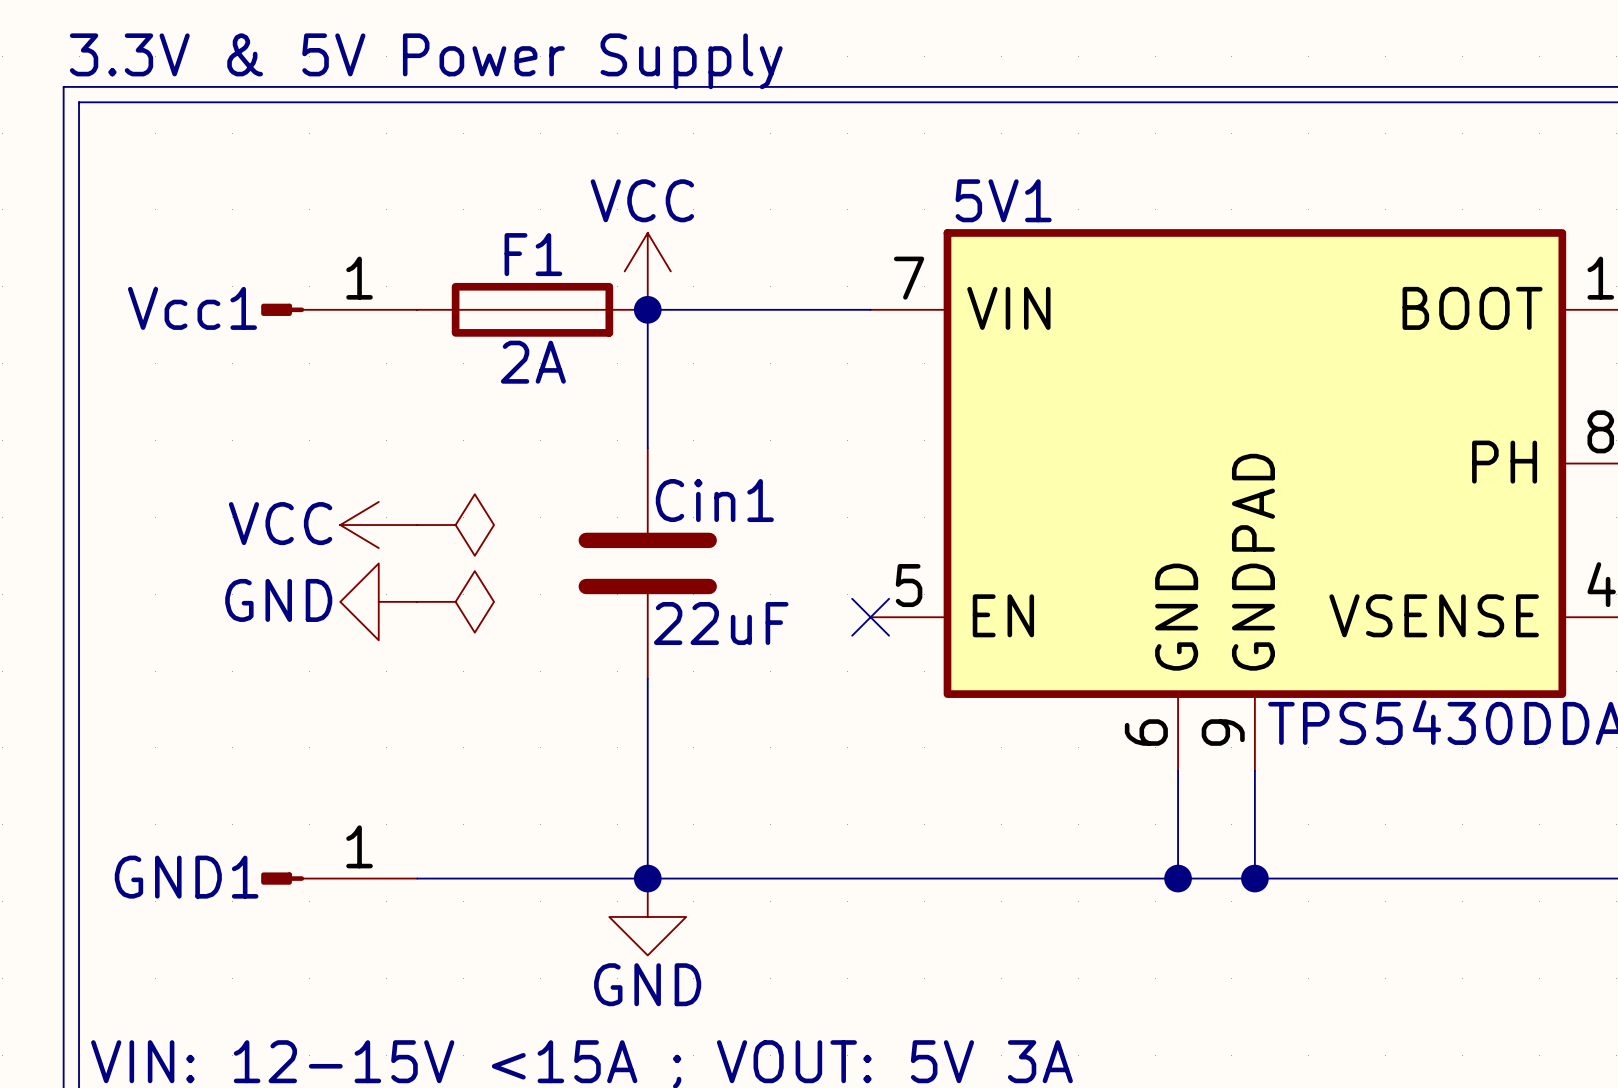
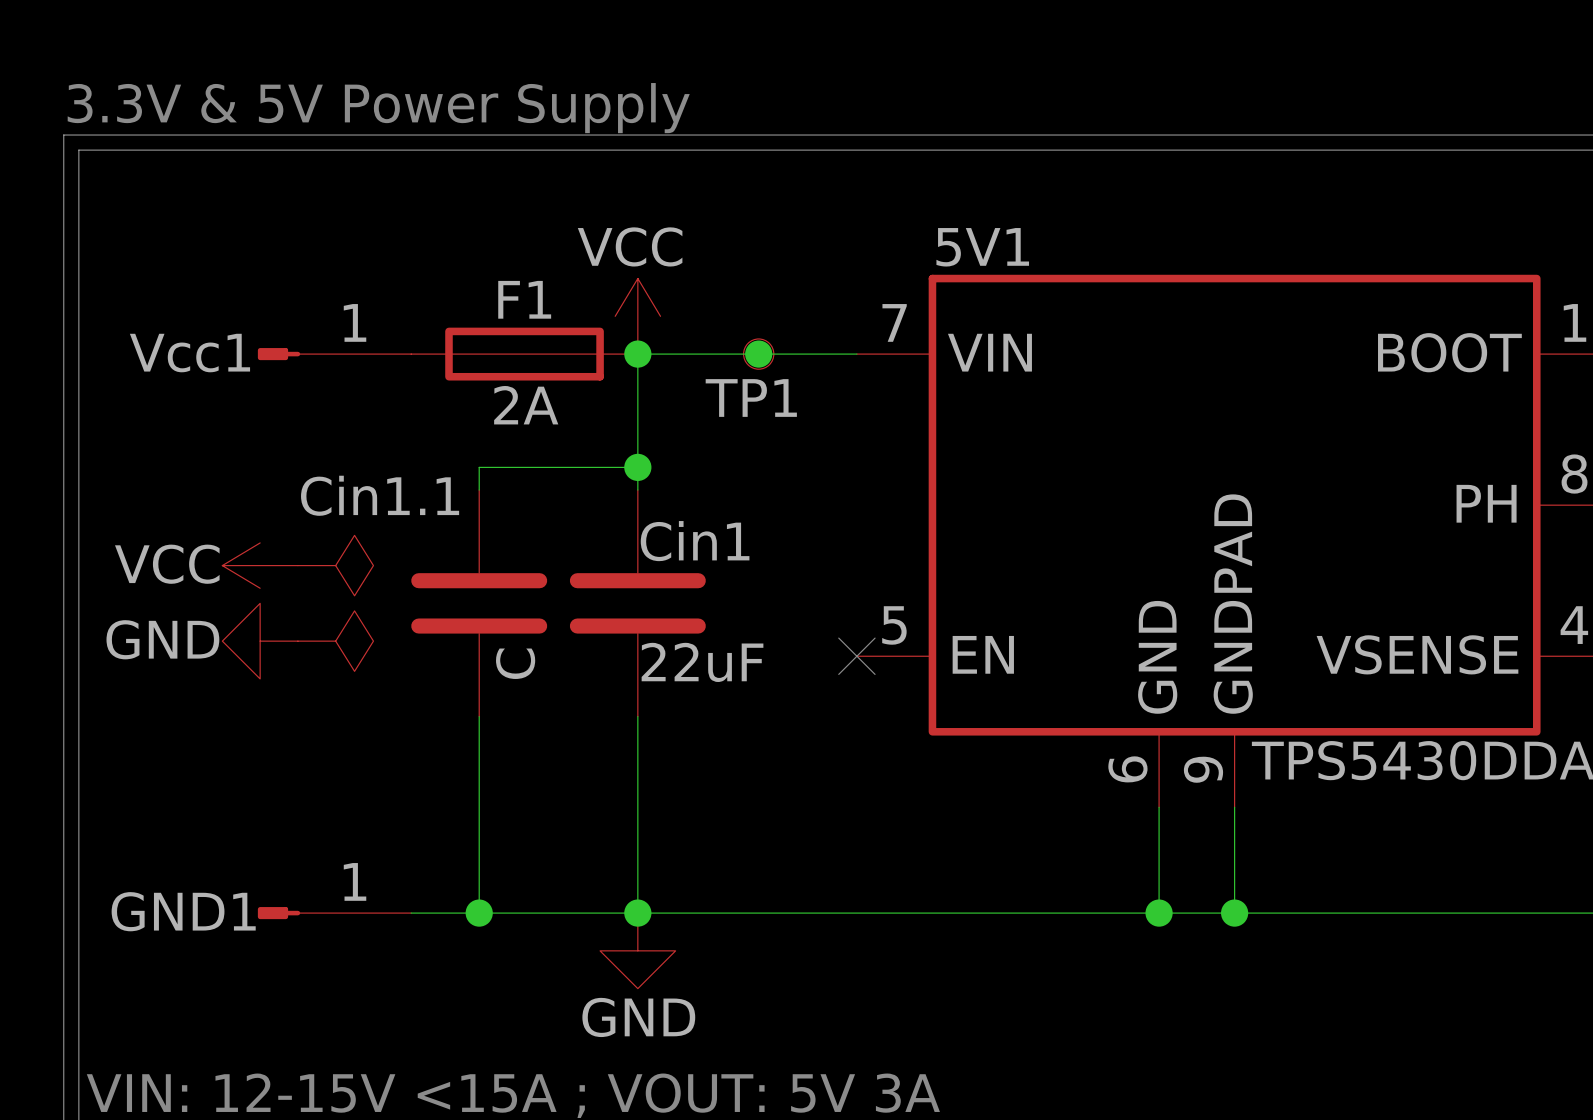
TP1: none -> (758, 354)
junction: none -> (758, 354)
wire: none -> (637, 467) (479, 467) (479, 490)
junction: none -> (637, 467)
power symbol: none -> (335, 565)
power symbol position: VCC (378, 525) -> VCC (260, 565)
power symbol: (455, 525) -> none
Cin1.1: none -> C (479, 603)
power symbol: none -> (335, 641)
power symbol position: GND (378, 601) -> GND (260, 641)
power symbol: (455, 601) -> none
wire: none -> (479, 716) (479, 913)
junction: none -> (479, 913)

